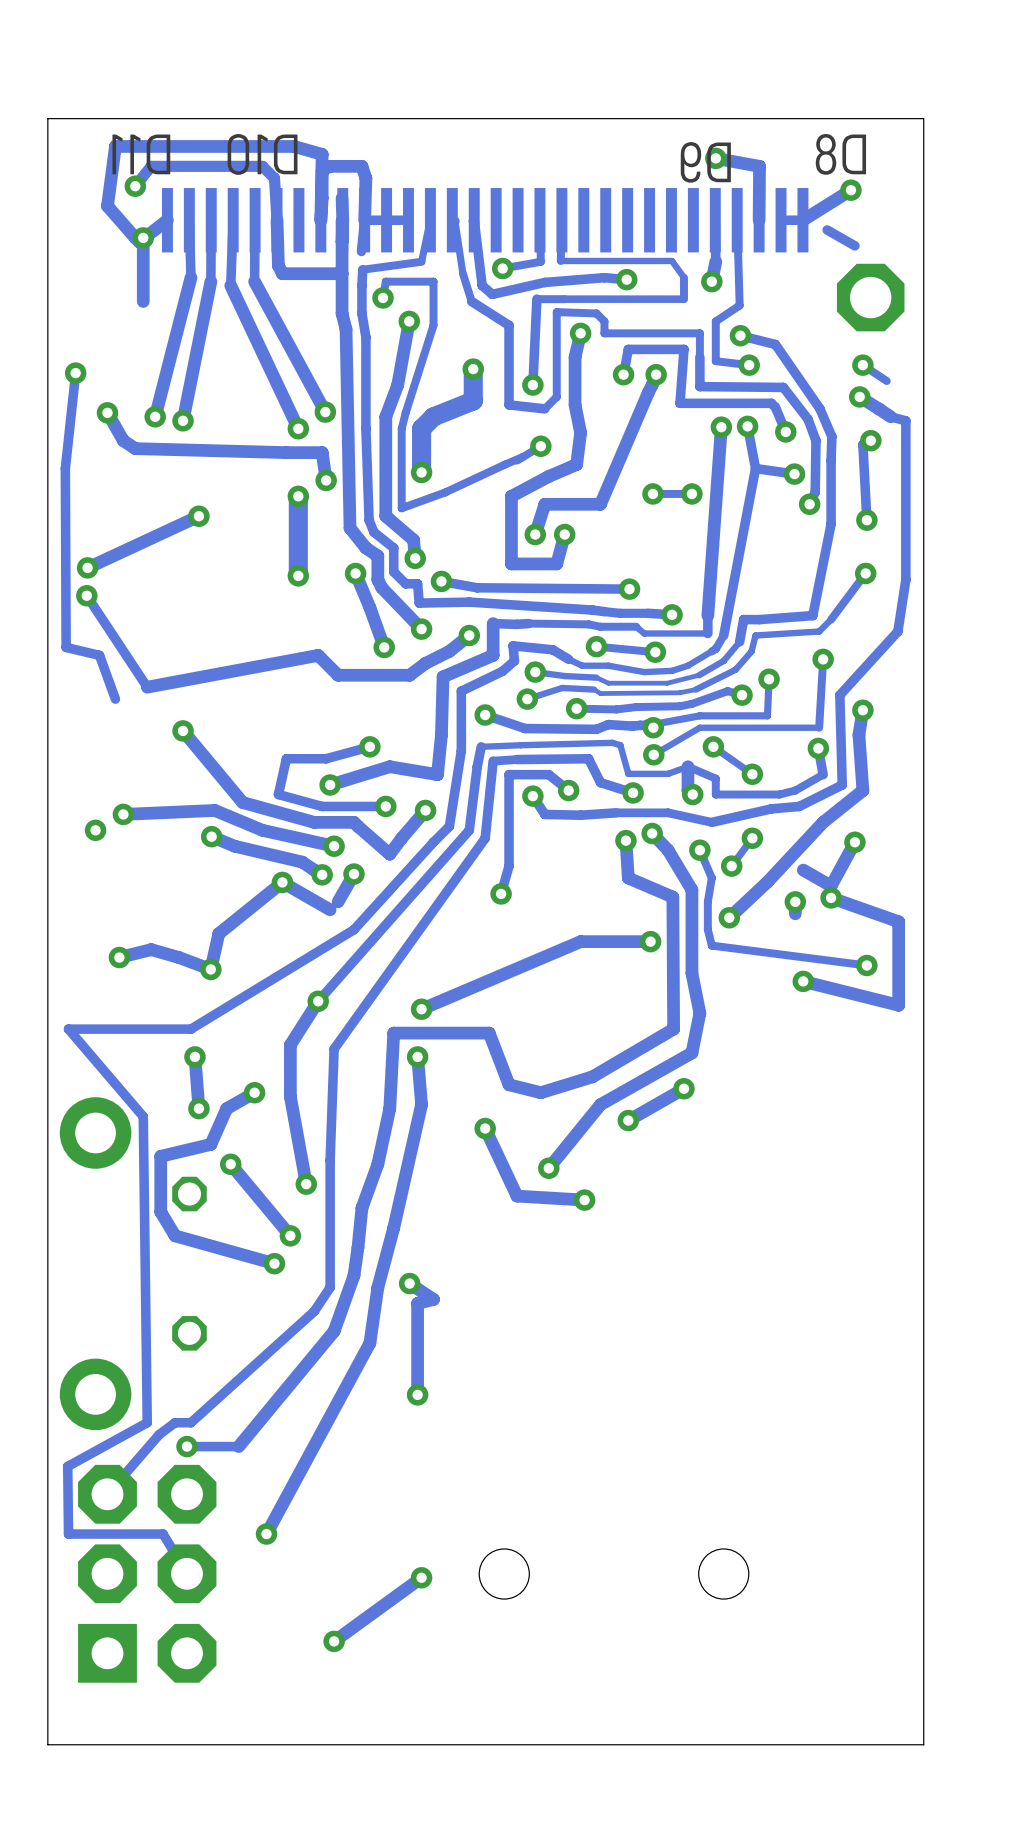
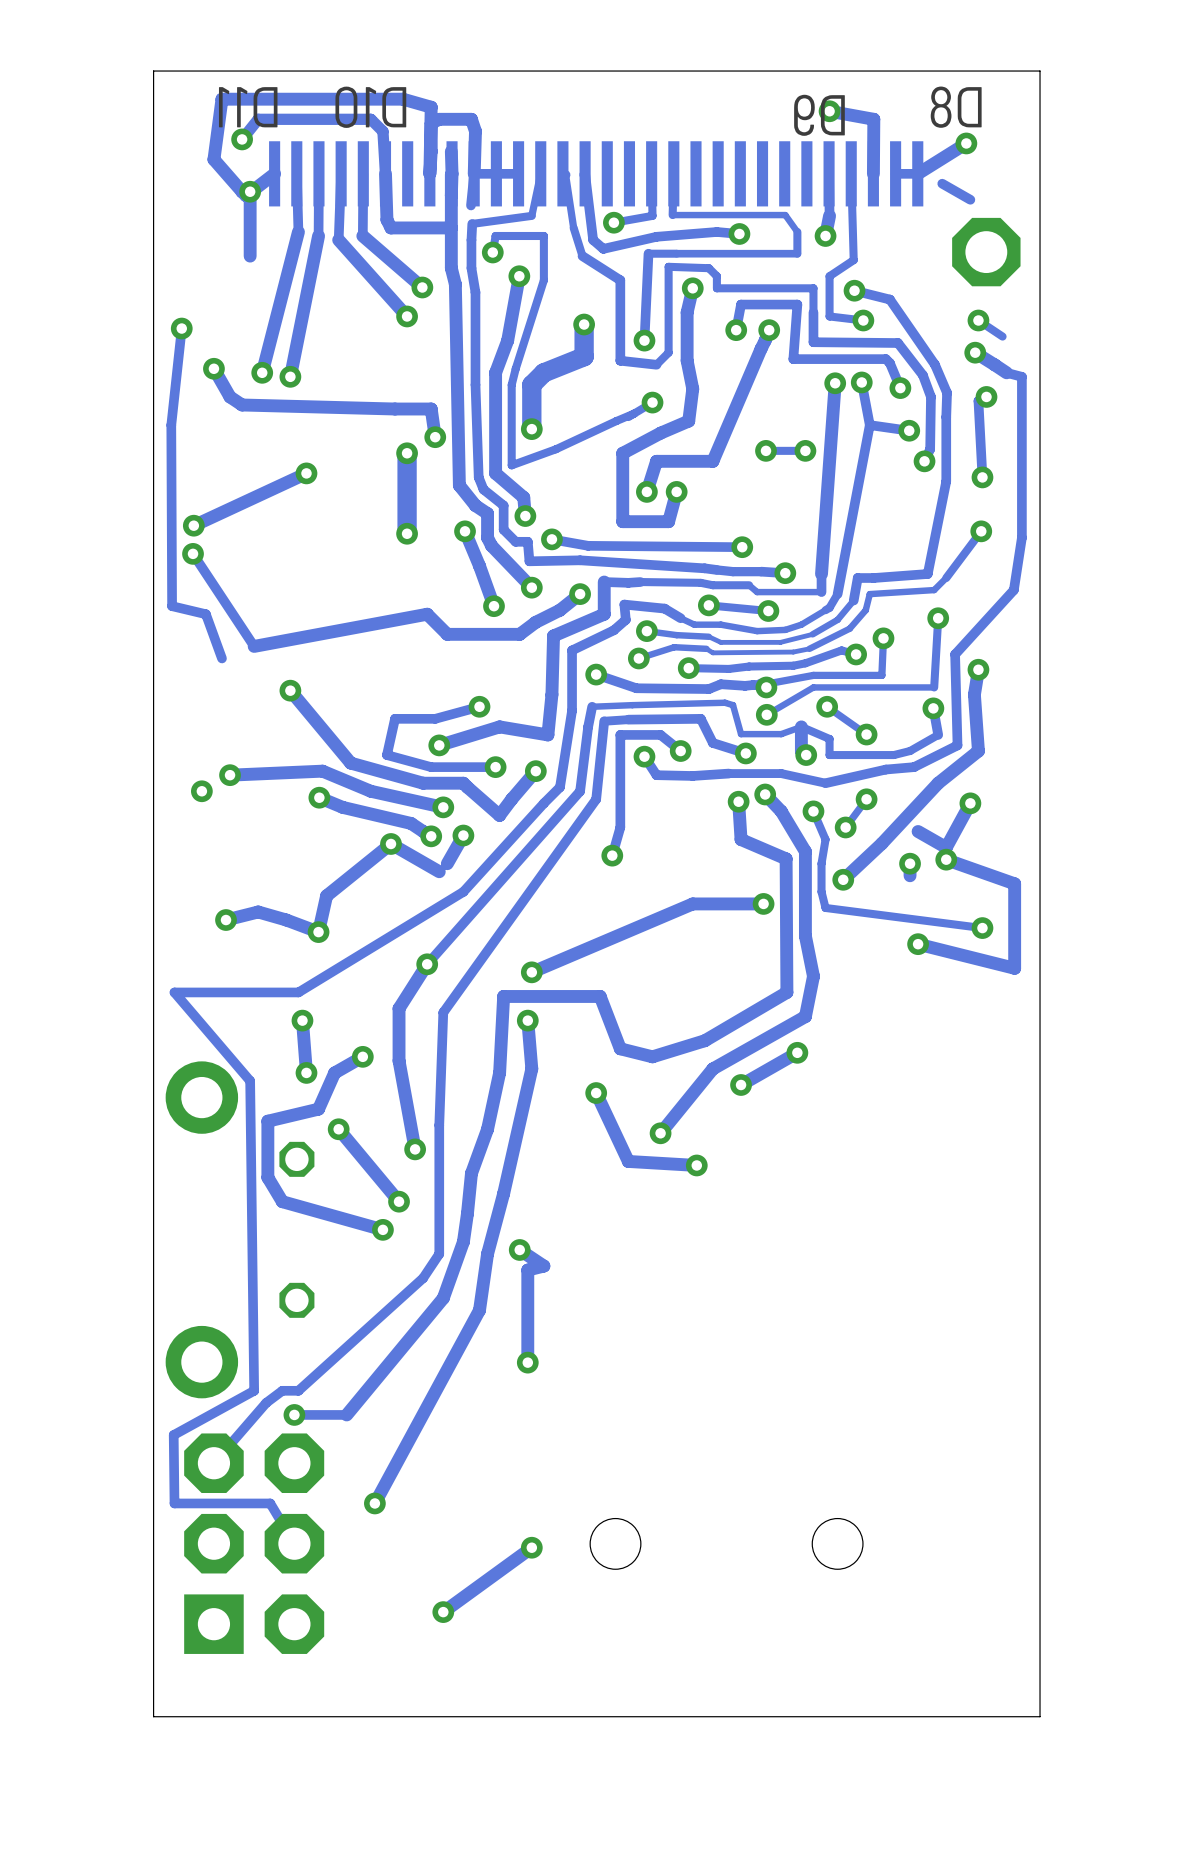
track: (254, 281) (325, 412) -> (362, 235) (422, 287)
track: (230, 285) (298, 428) -> (338, 240) (407, 316)
via: none -> (422, 287)
via: none -> (407, 316)
via: (325, 412) -> none
via: (298, 428) -> none

